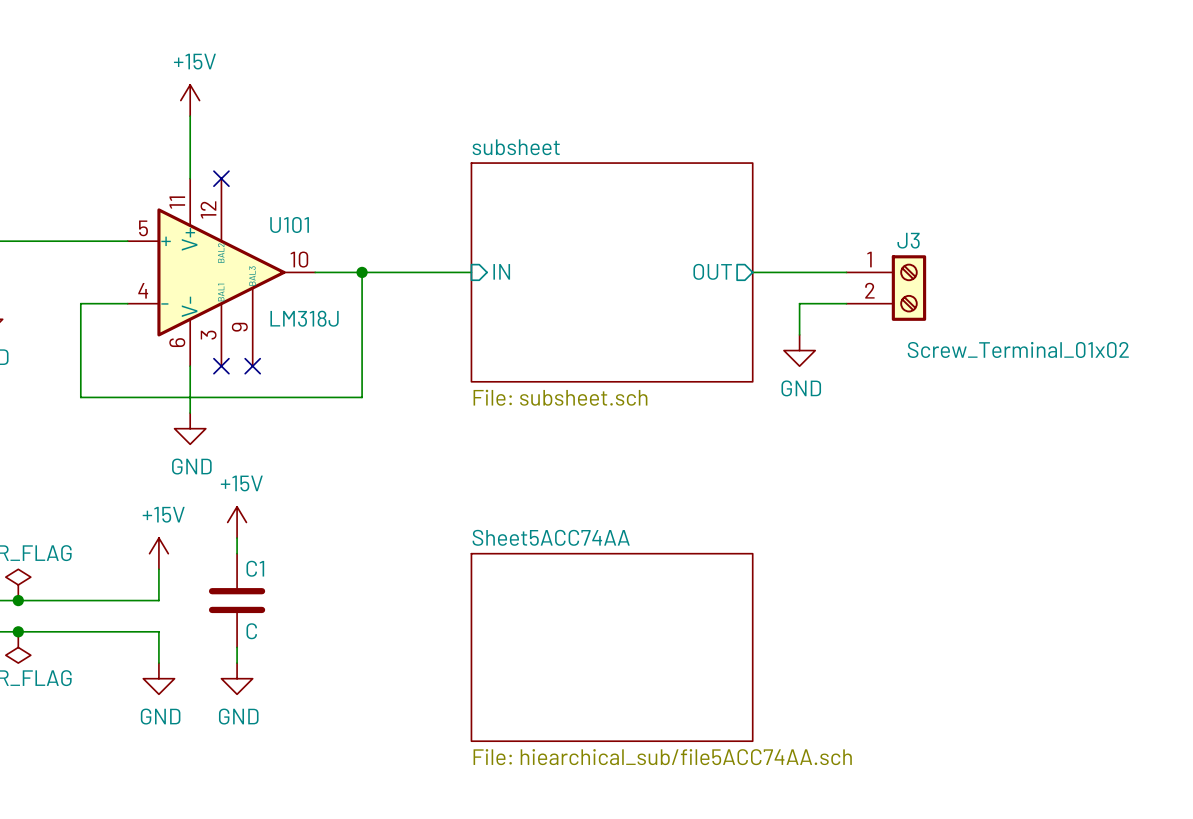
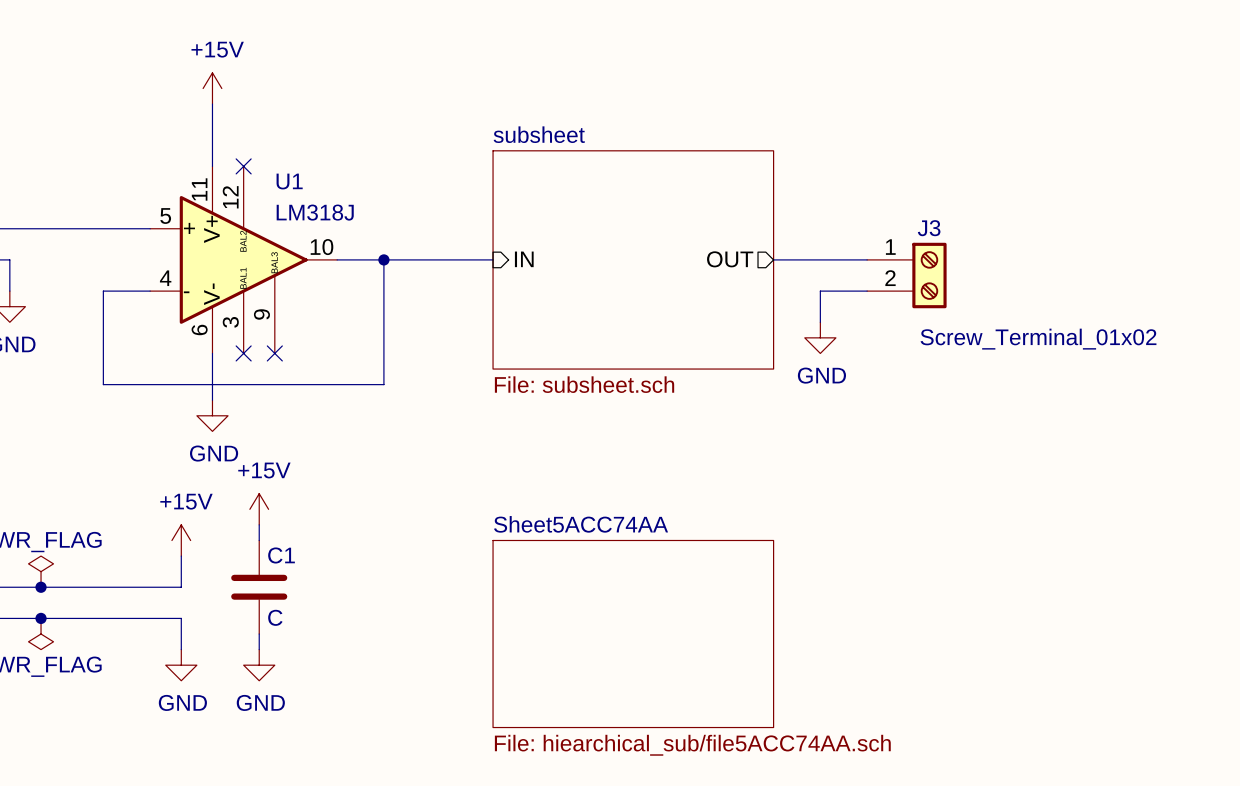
U101 name: U101 (289, 224) -> U1 (289, 181)
U101 value position: LM318J (304, 318) -> LM318J (315, 212)

